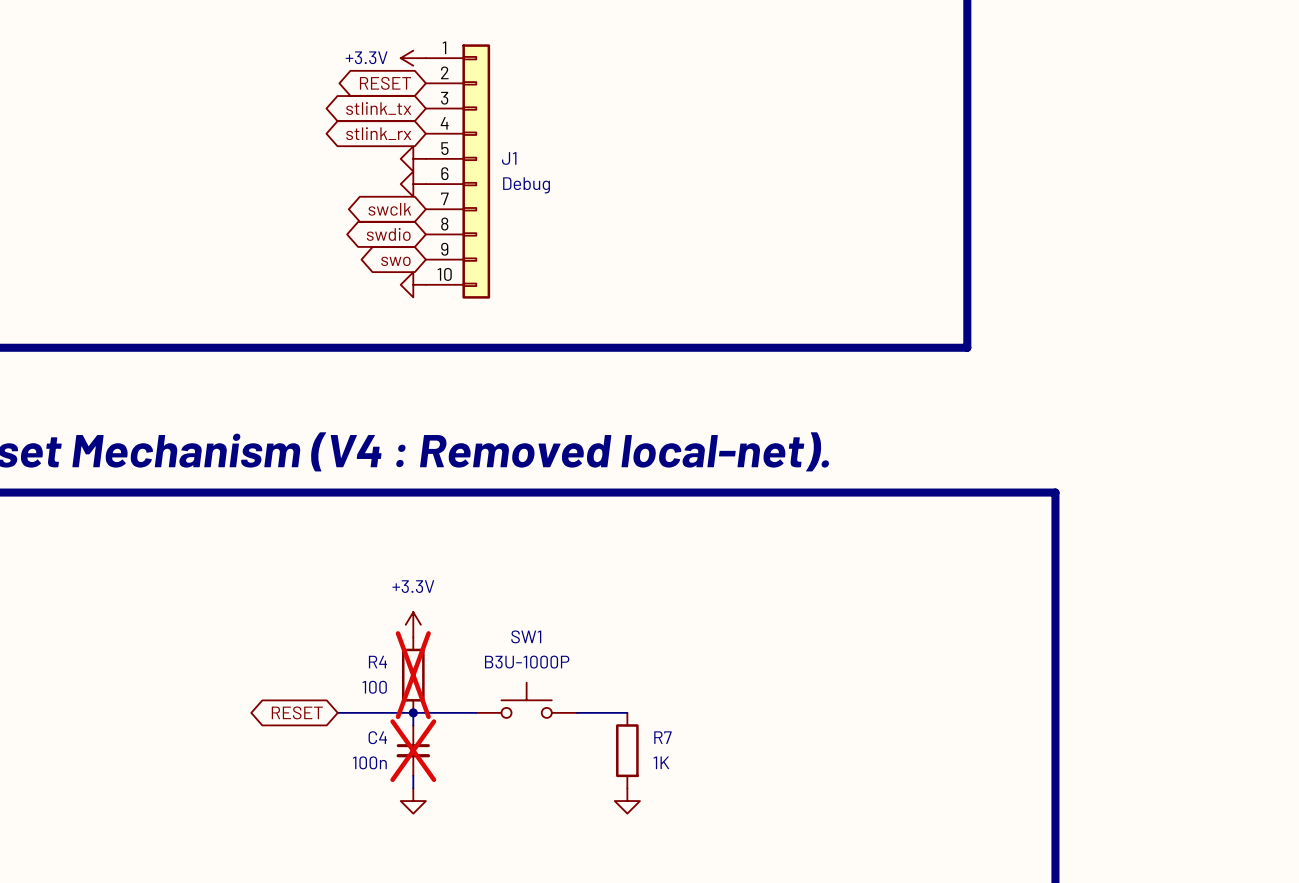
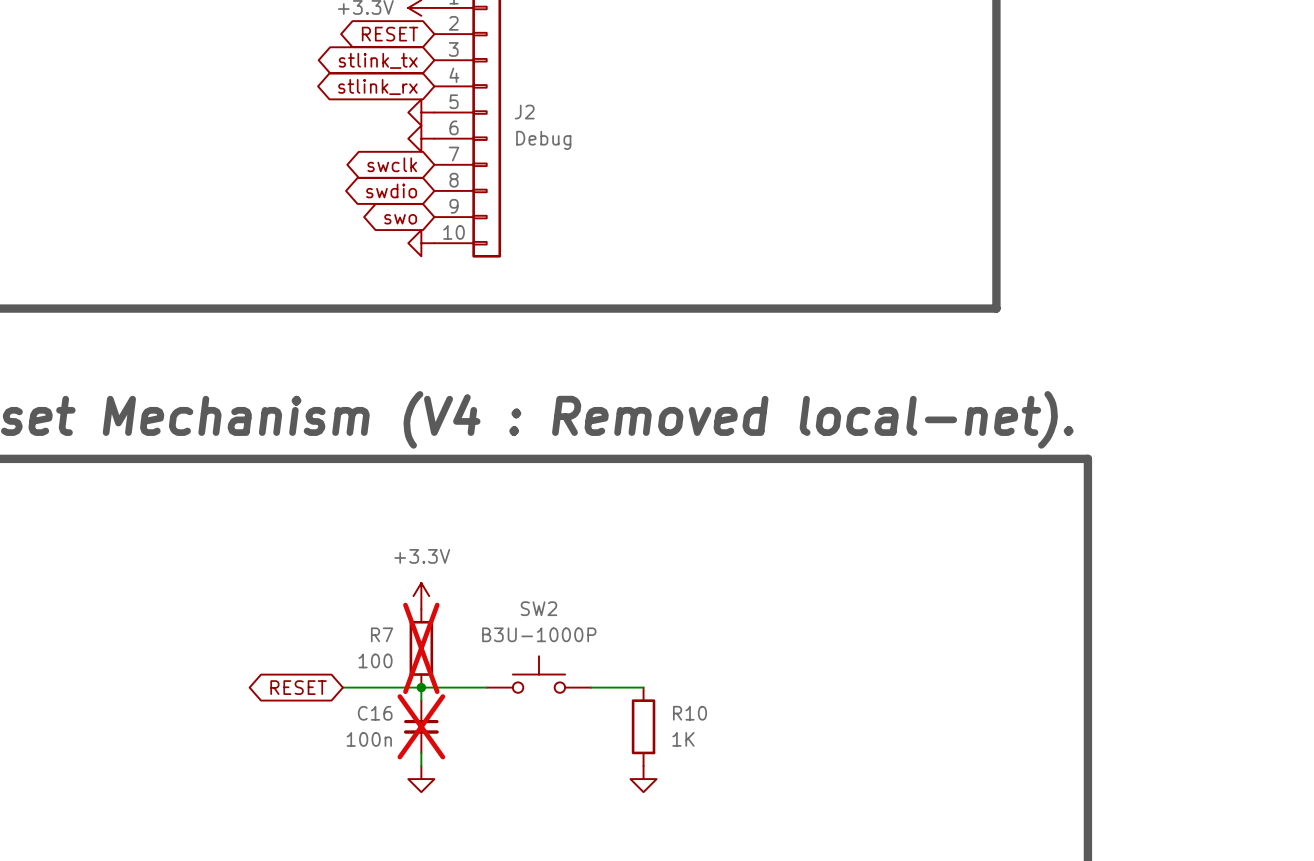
J1 name: J1 (509, 158) -> J2 (524, 112)
SW1 name: SW1 (526, 636) -> SW2 (538, 608)
R4 name: R4 (377, 662) -> R7 (382, 634)
C4 name: C4 (377, 737) -> C16 (375, 713)
R7 name: R7 (662, 737) -> R10 (690, 713)

